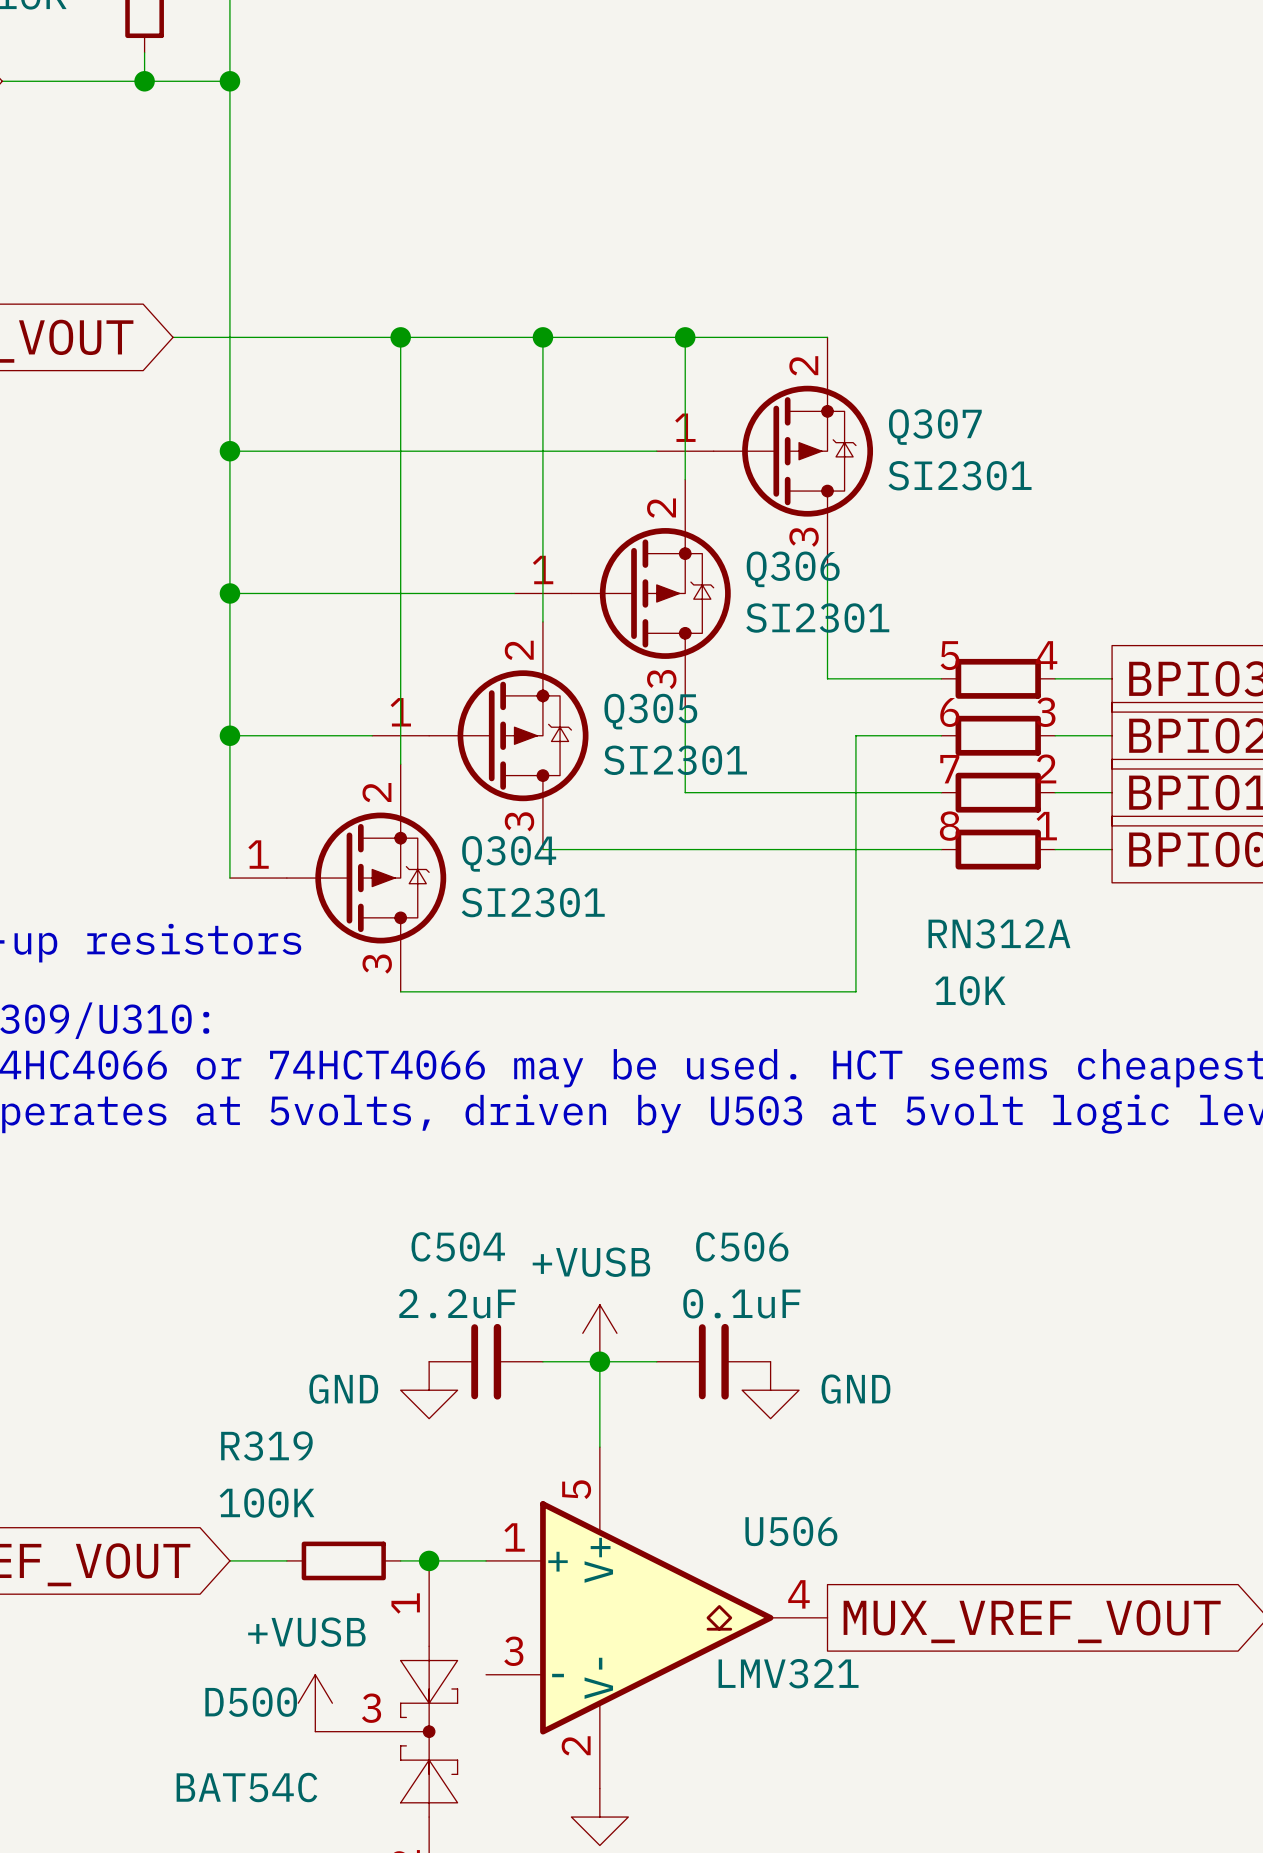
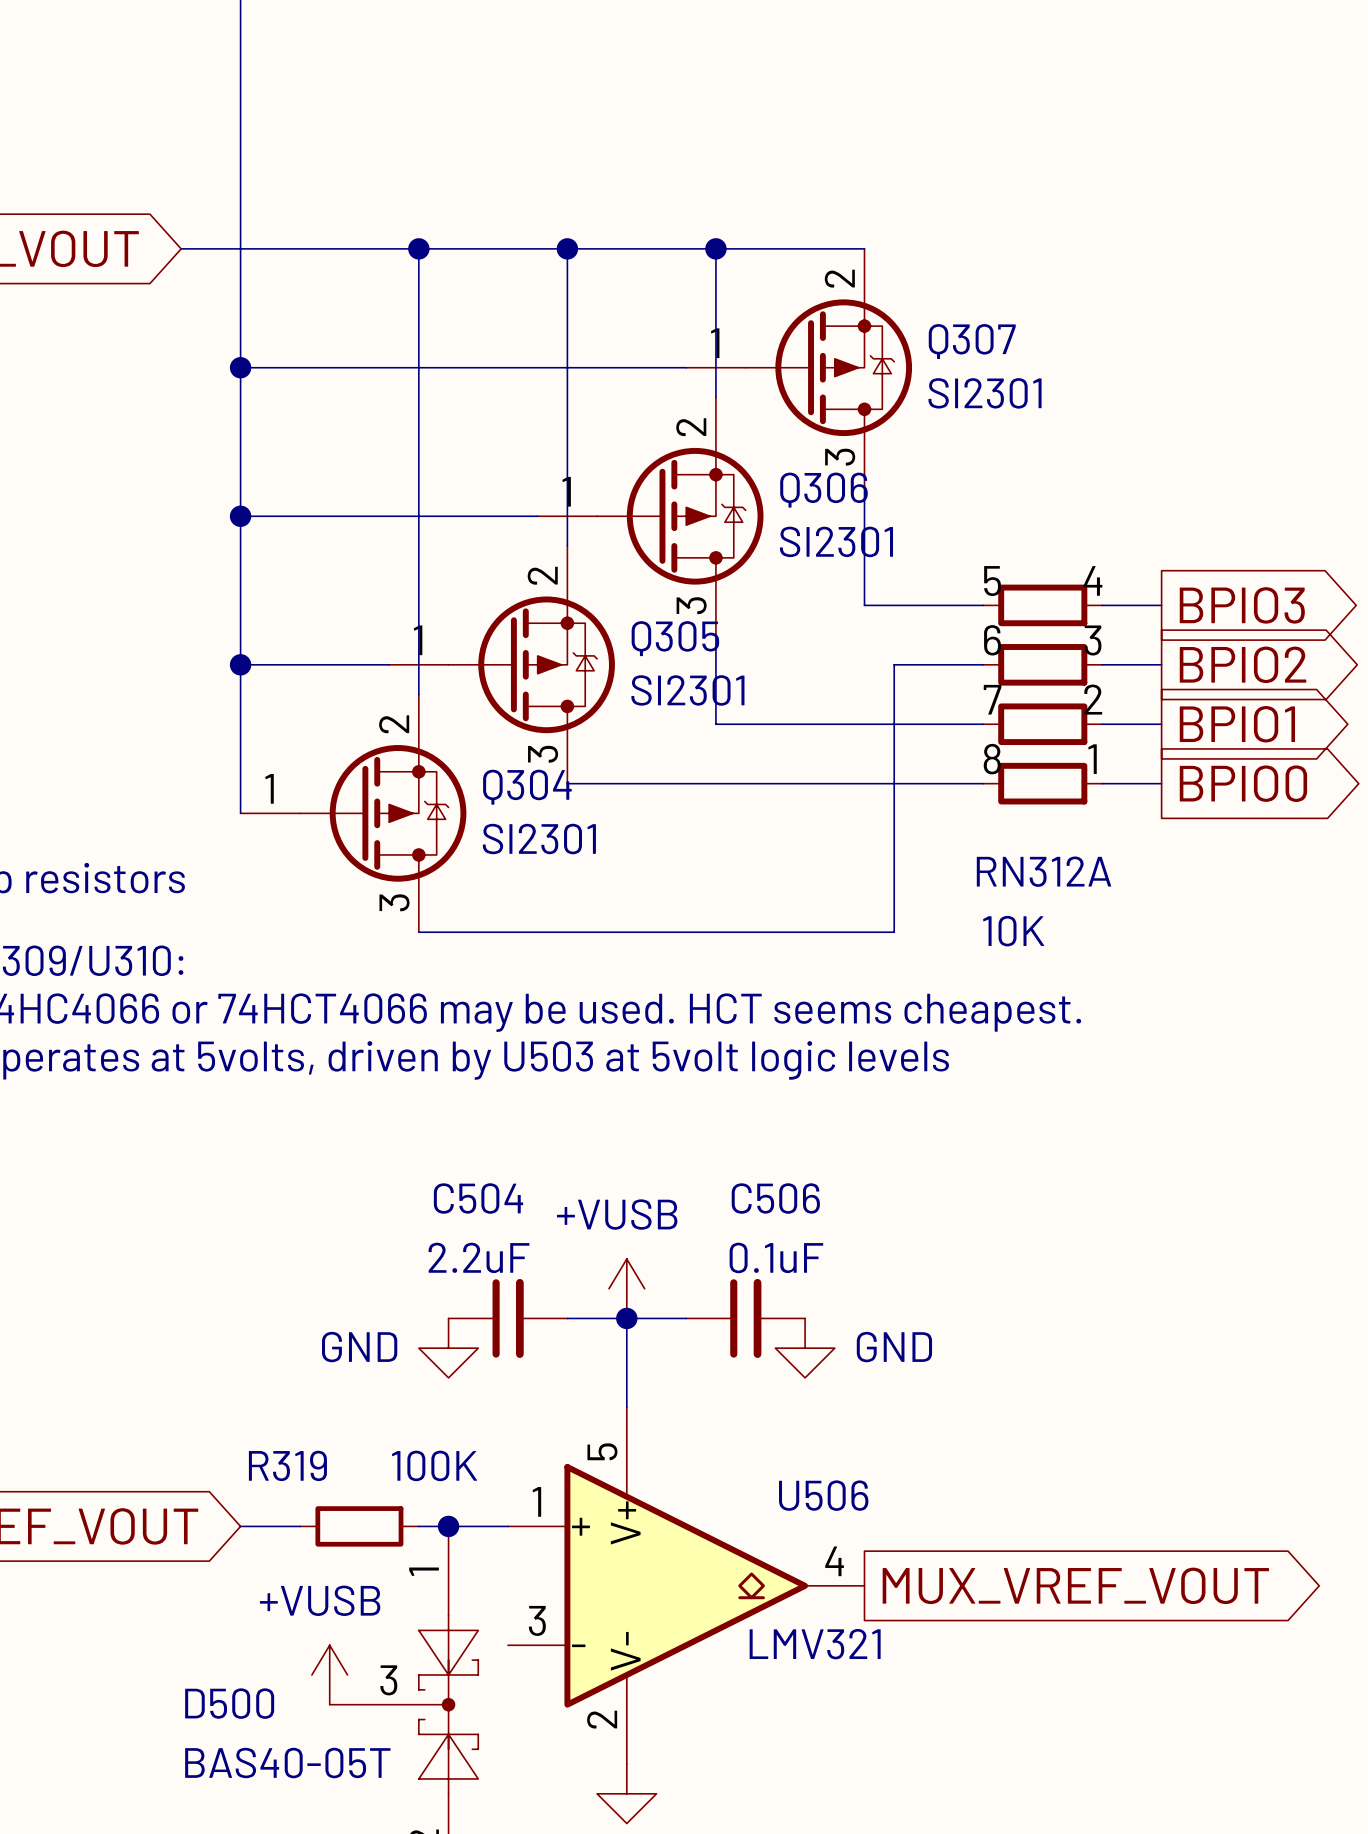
R319 name position: R319 (266, 1446) -> R319 (287, 1465)
R319 value position: 100K (267, 1502) -> 100K (434, 1465)
D500 name position: D500 (251, 1702) -> D500 (229, 1703)
D500 value: BAT54C (246, 1787) -> BAS40-05T (287, 1763)

